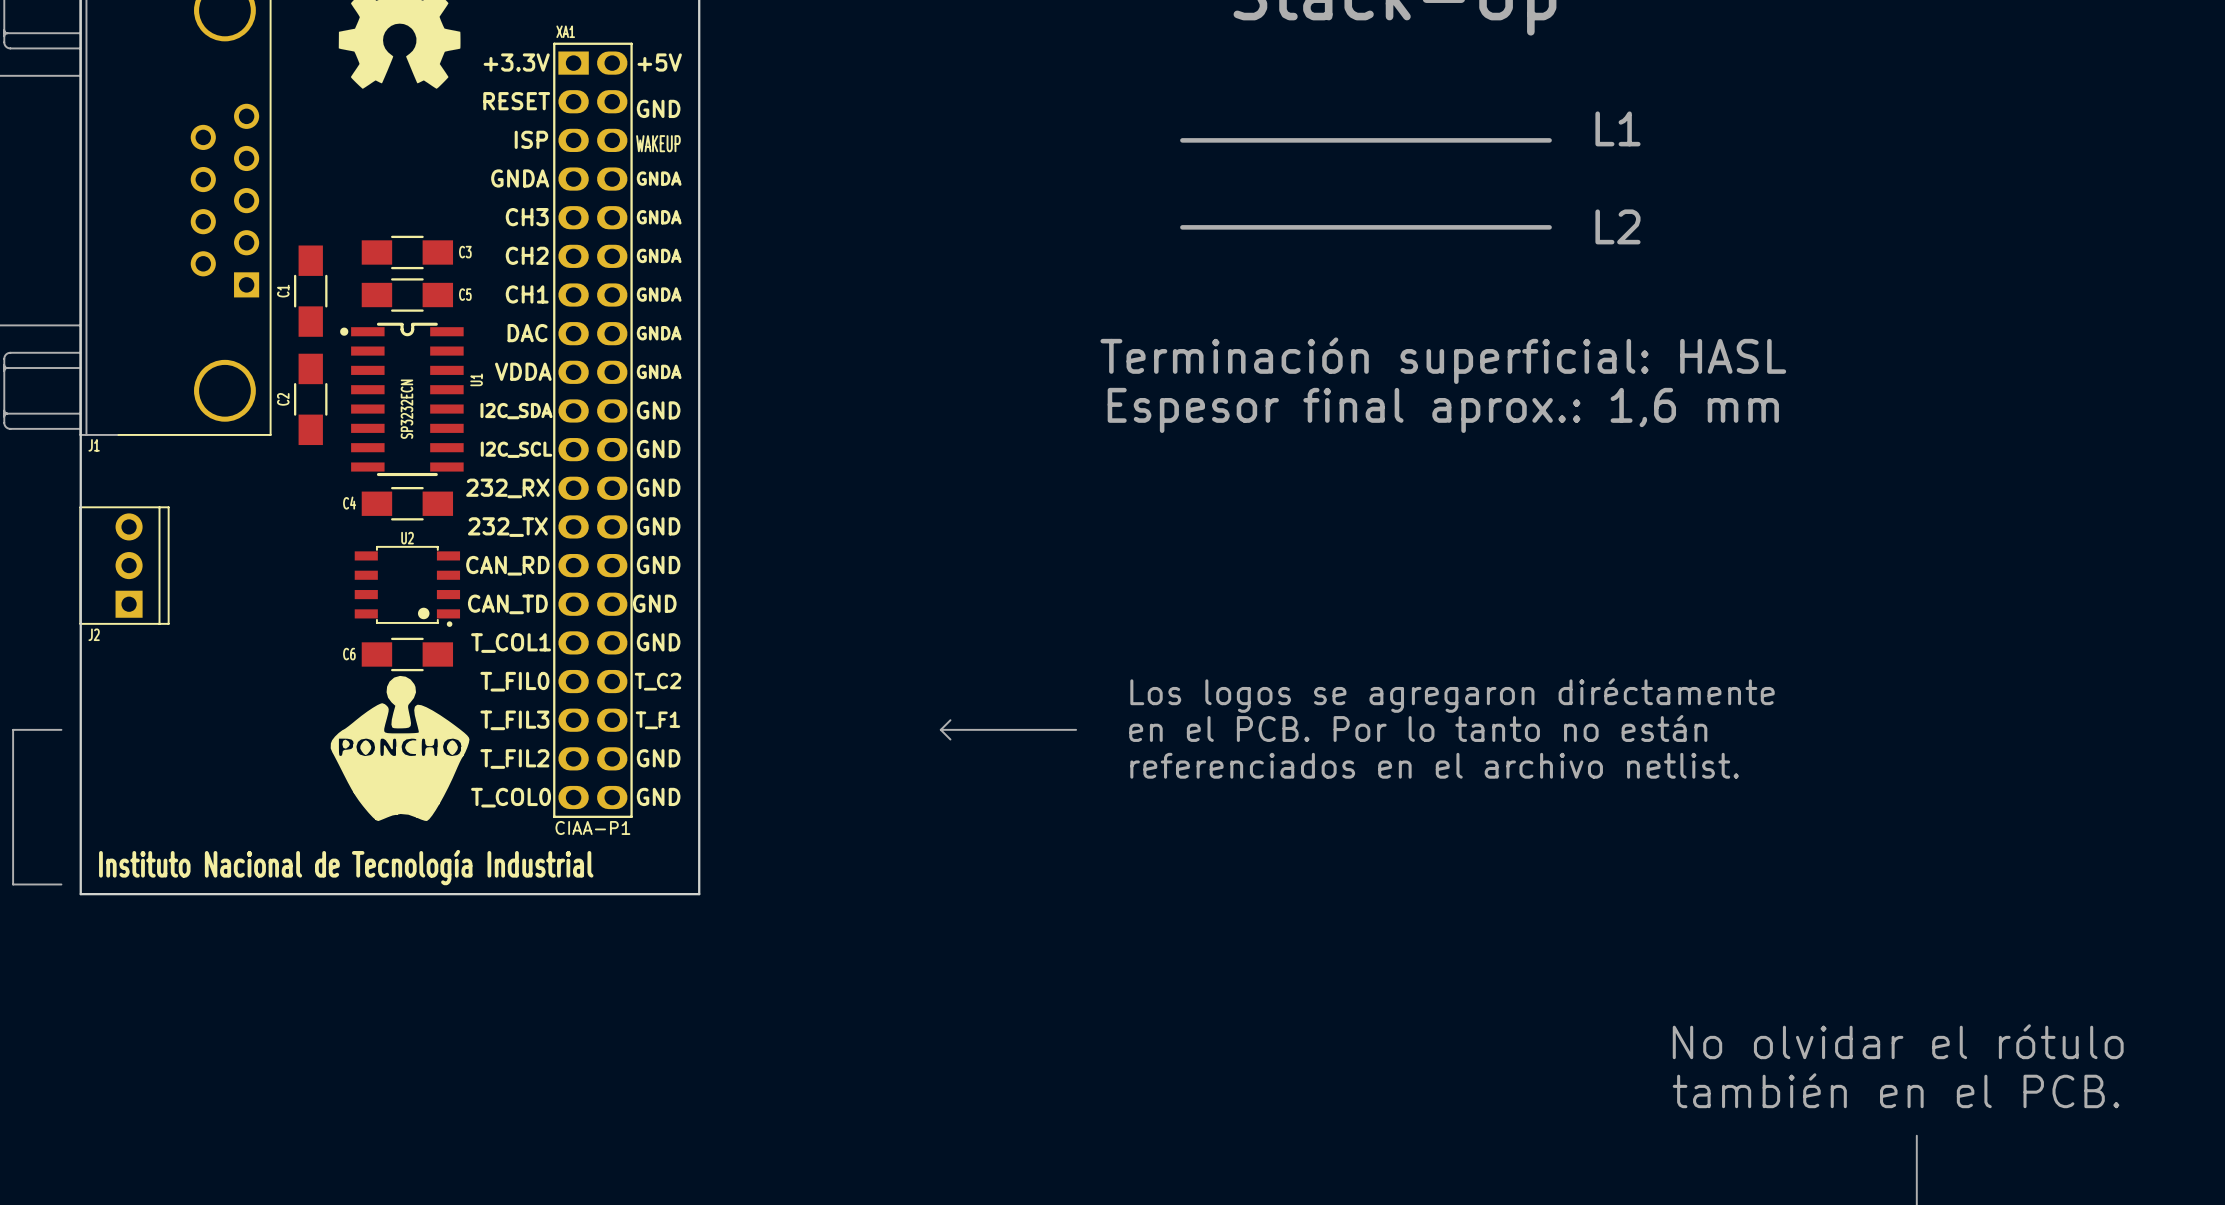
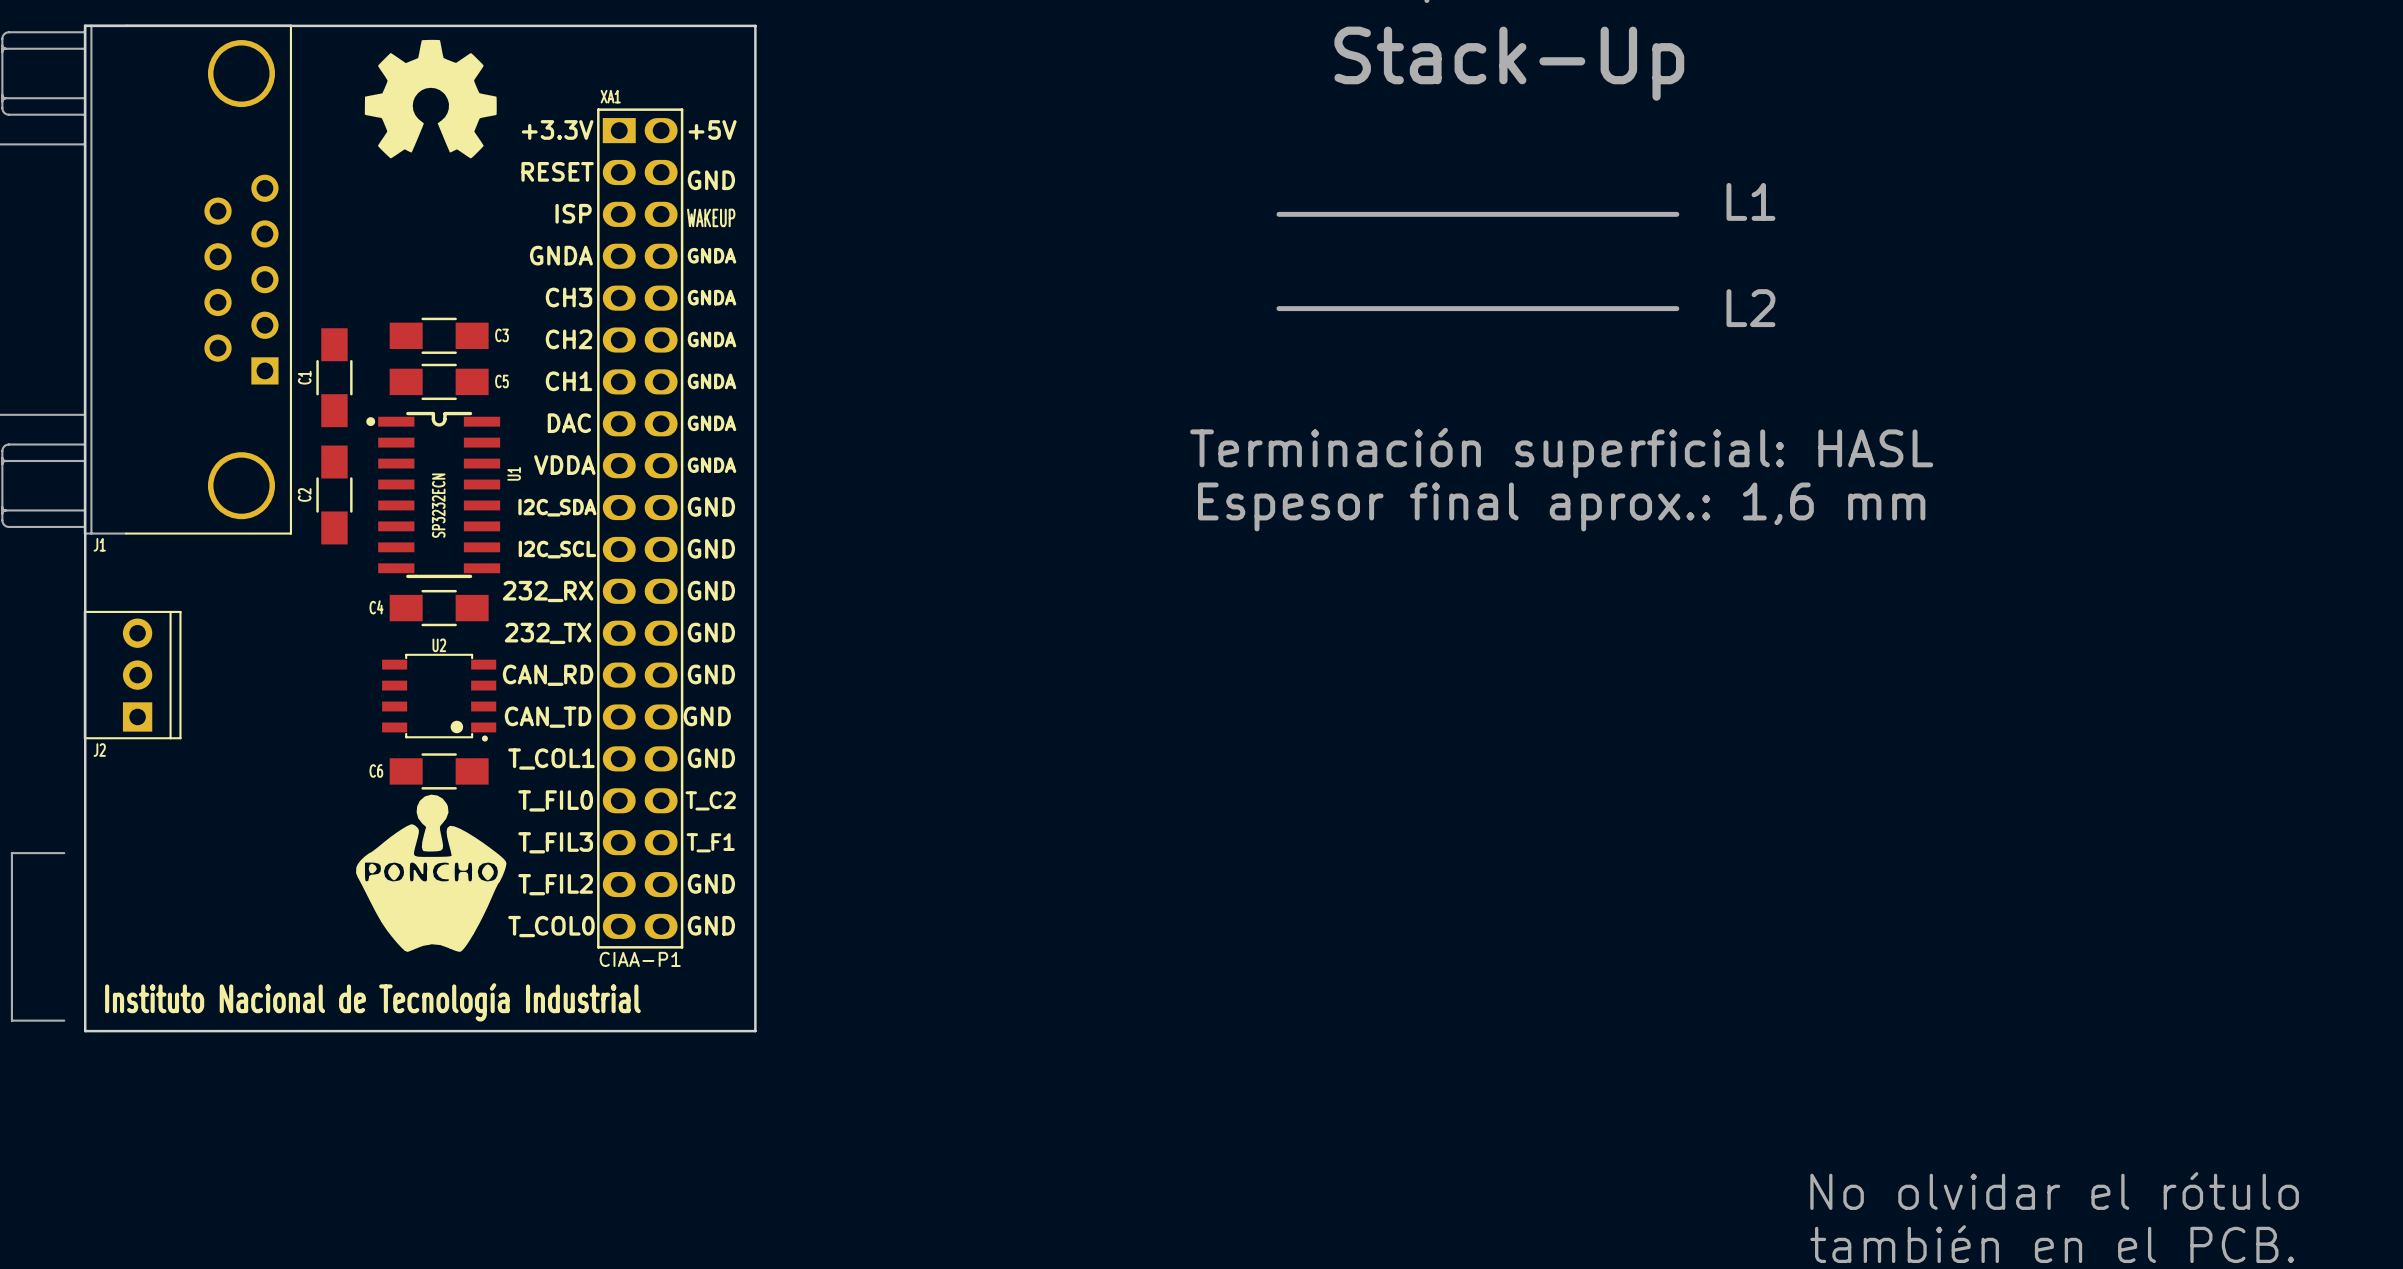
text: Los logos se agregaron diréctamente (1452, 695) -> none
line: (950, 720) (940, 729) -> none
text: en el PCB. Por lo tanto no están (1418, 728) -> none
line: (940, 729) (950, 739) -> none
line: (940, 729) (1076, 729) -> none
text: referenciados en el archivo netlist. (1434, 765) -> none

